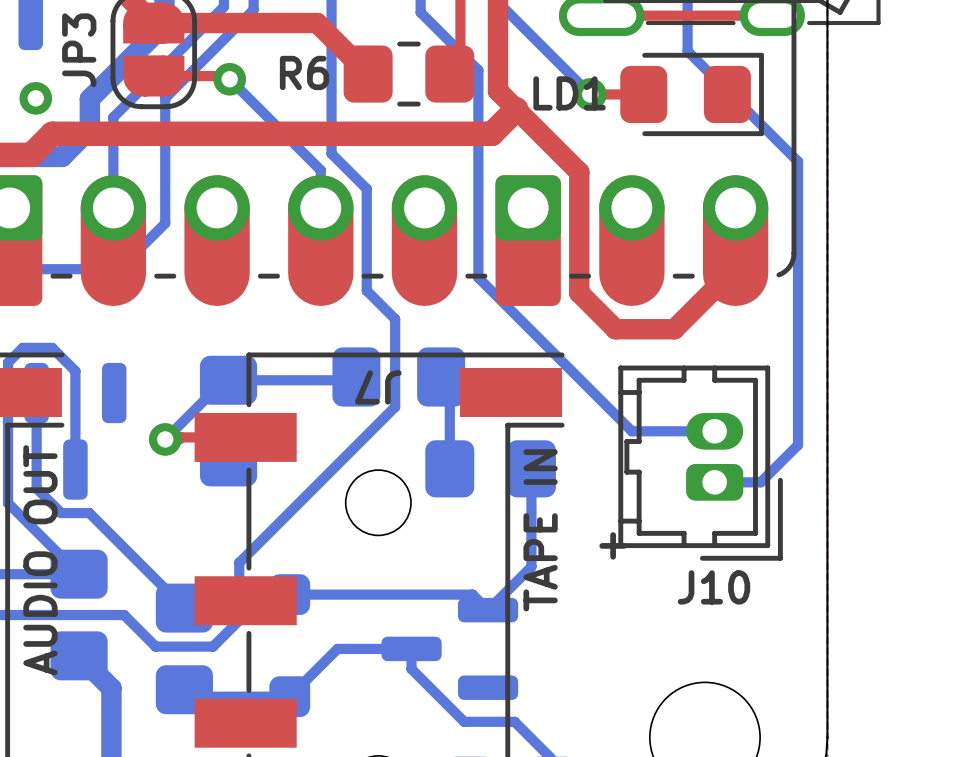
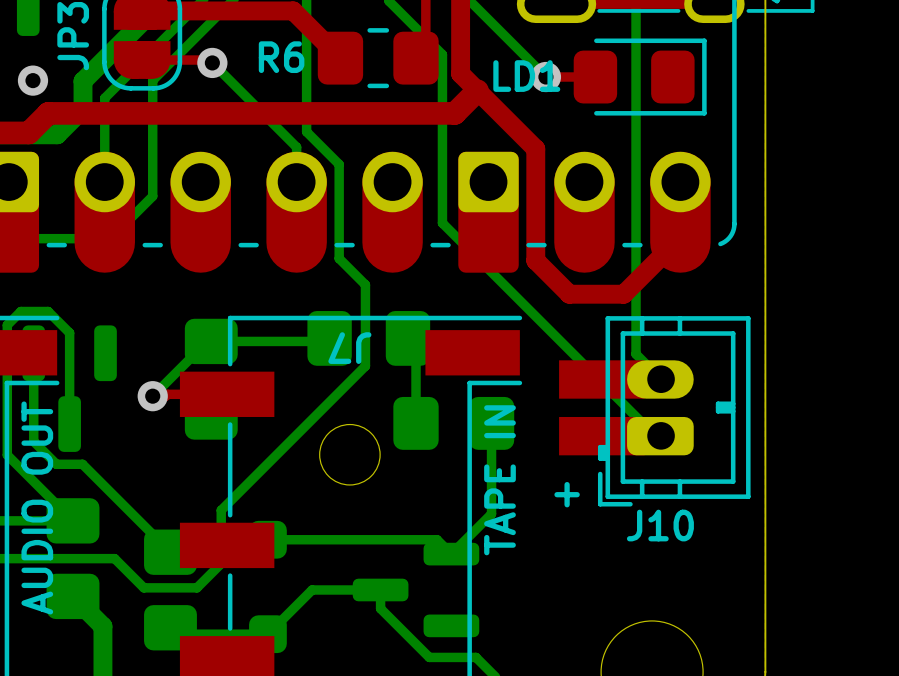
bottom track: (687, 51) (798, 161) (798, 445) (760, 482) (733, 482) -> (636, 36) (636, 354) (661, 379)
bottom track: (478, 252) (478, 277) (631, 431) (704, 431) -> (442, 223) (655, 435) (661, 435)
J10 footprint: [618, 365, 783, 561] -> [559, 316, 751, 507]

